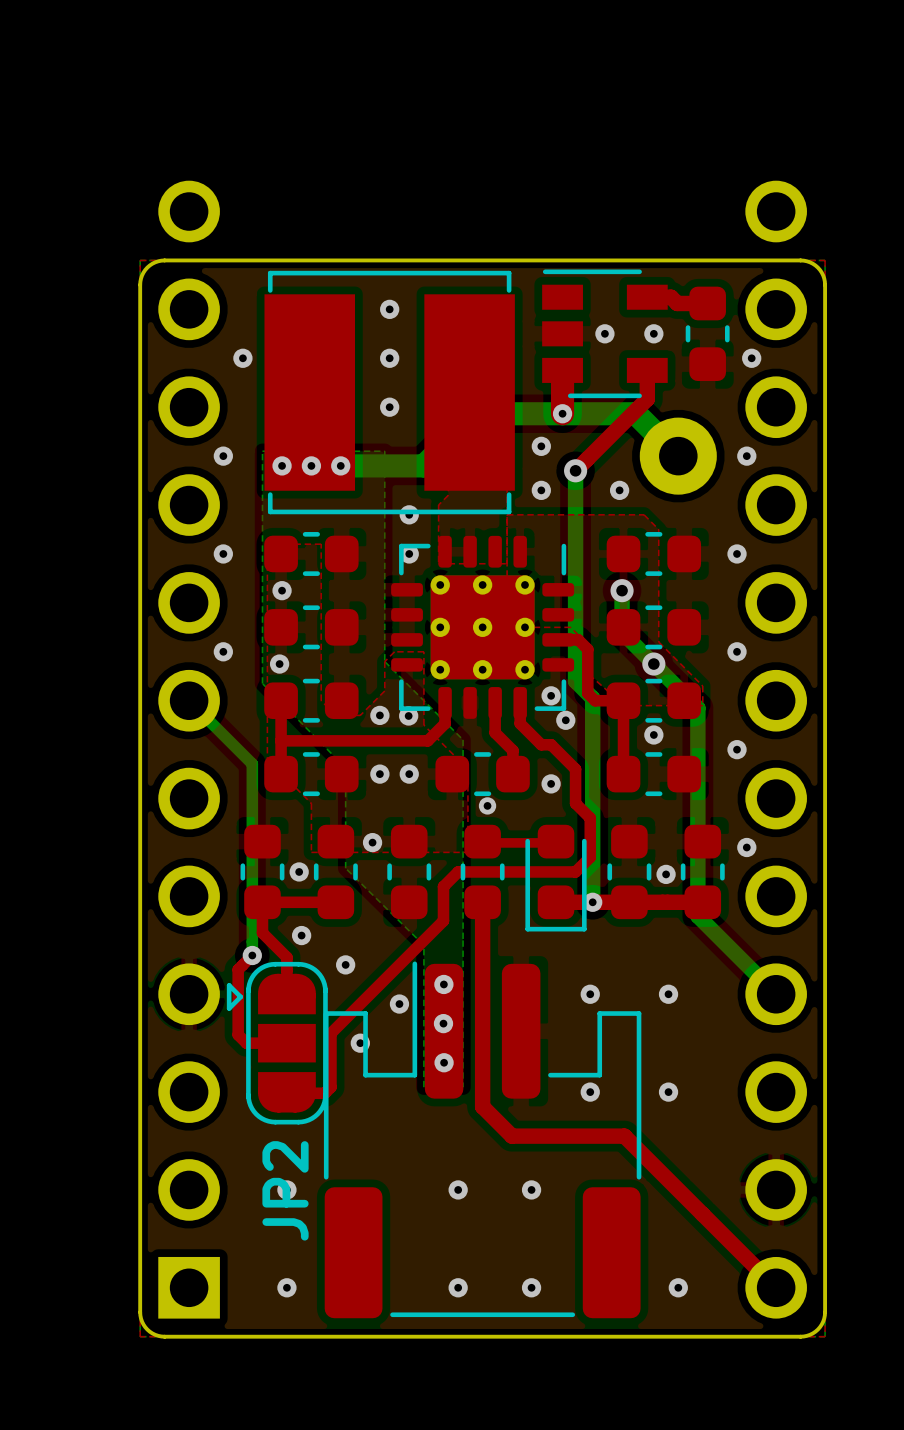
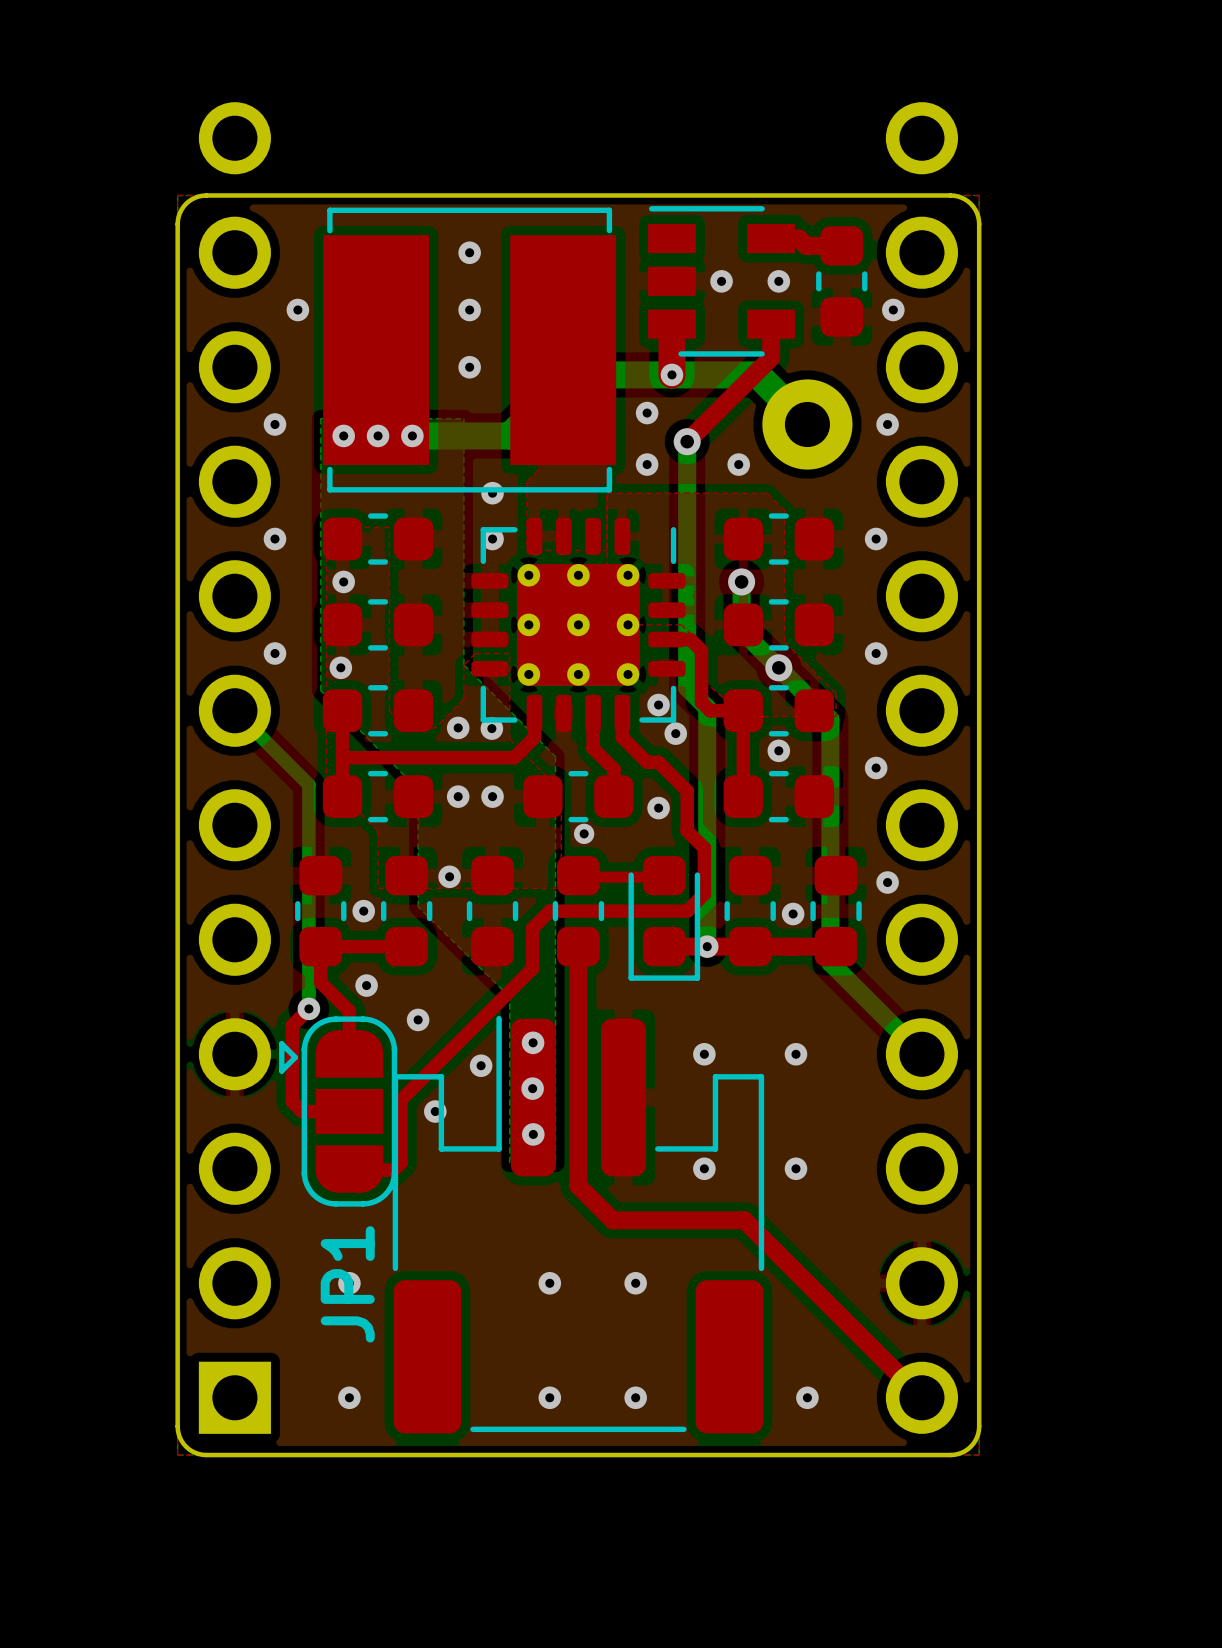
JP2 name: JP2 (285, 1190) -> JP1 (347, 1284)

